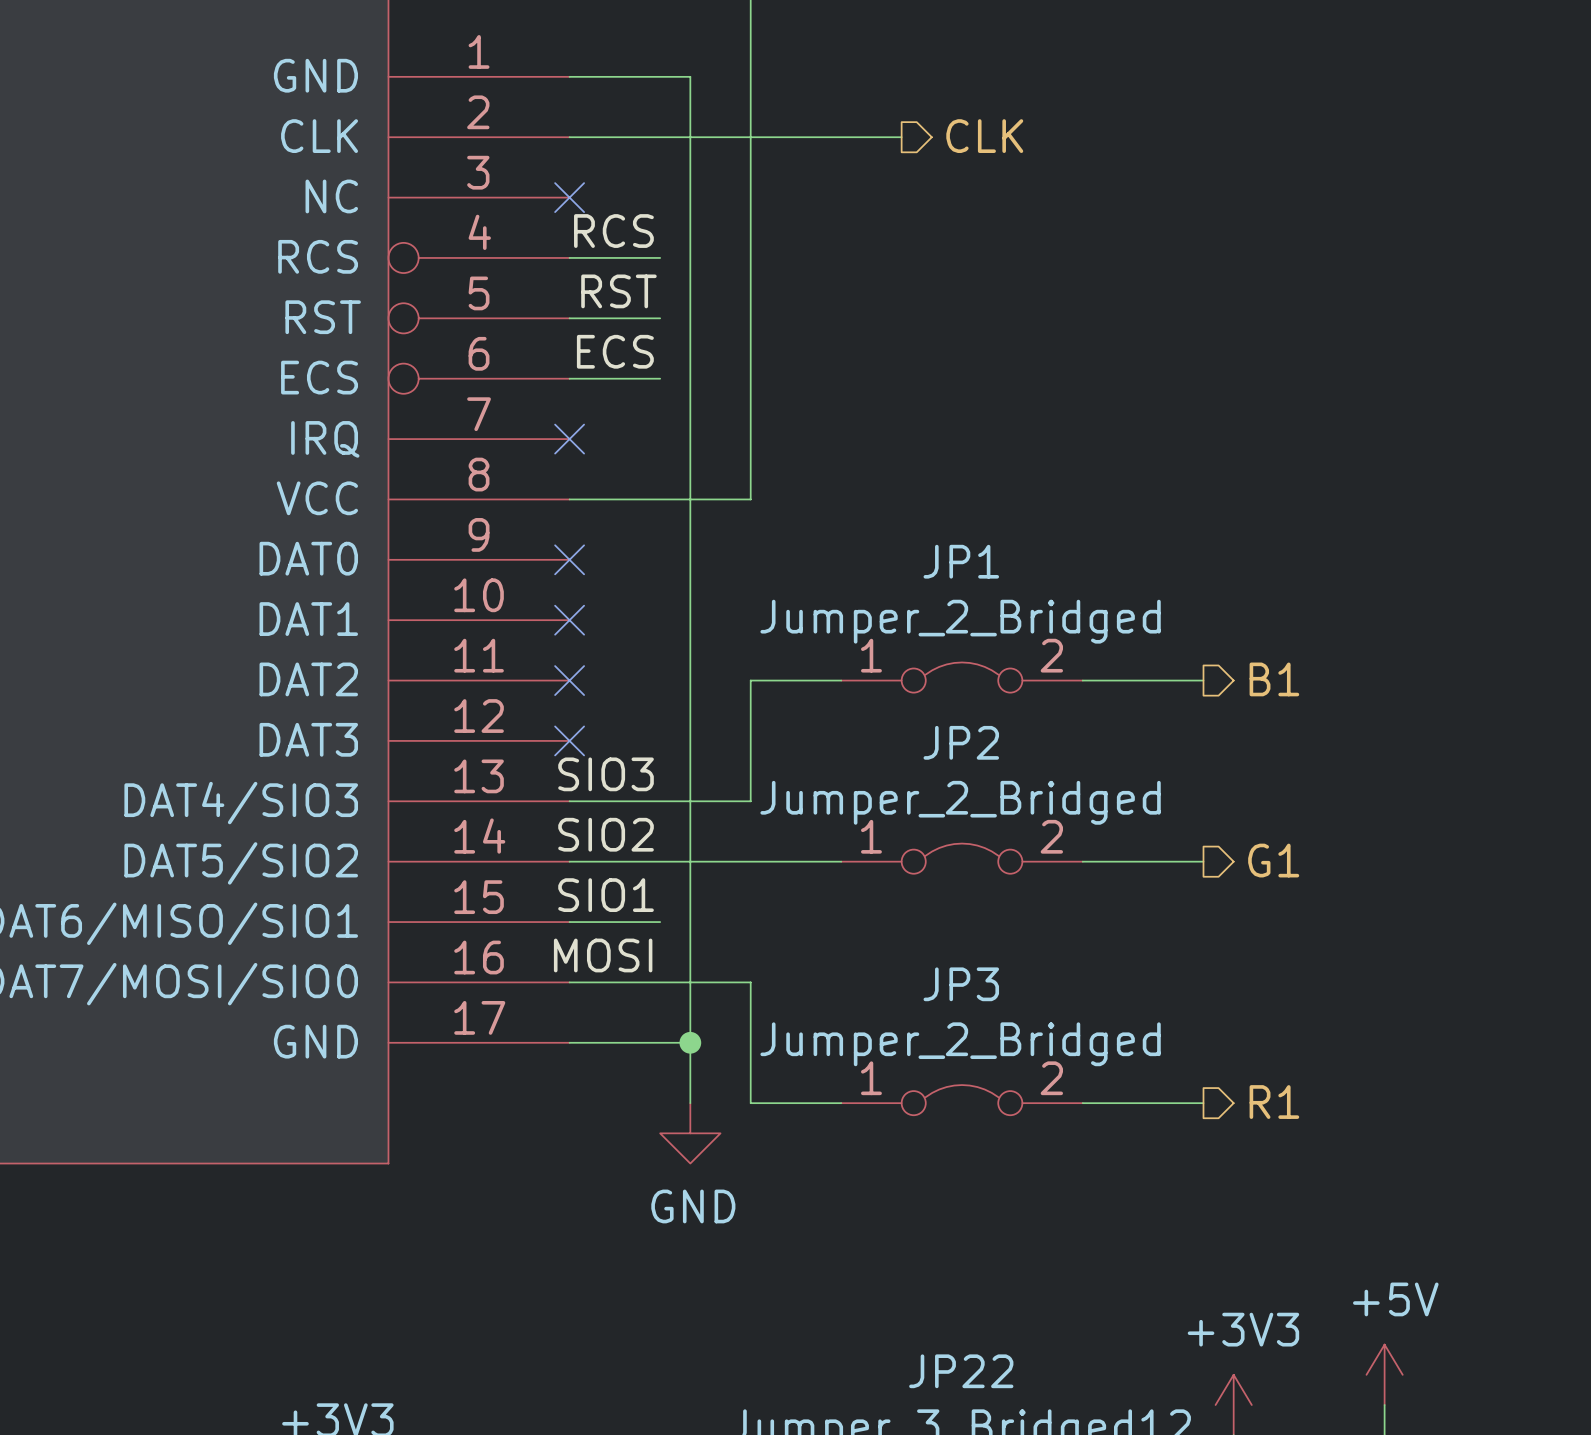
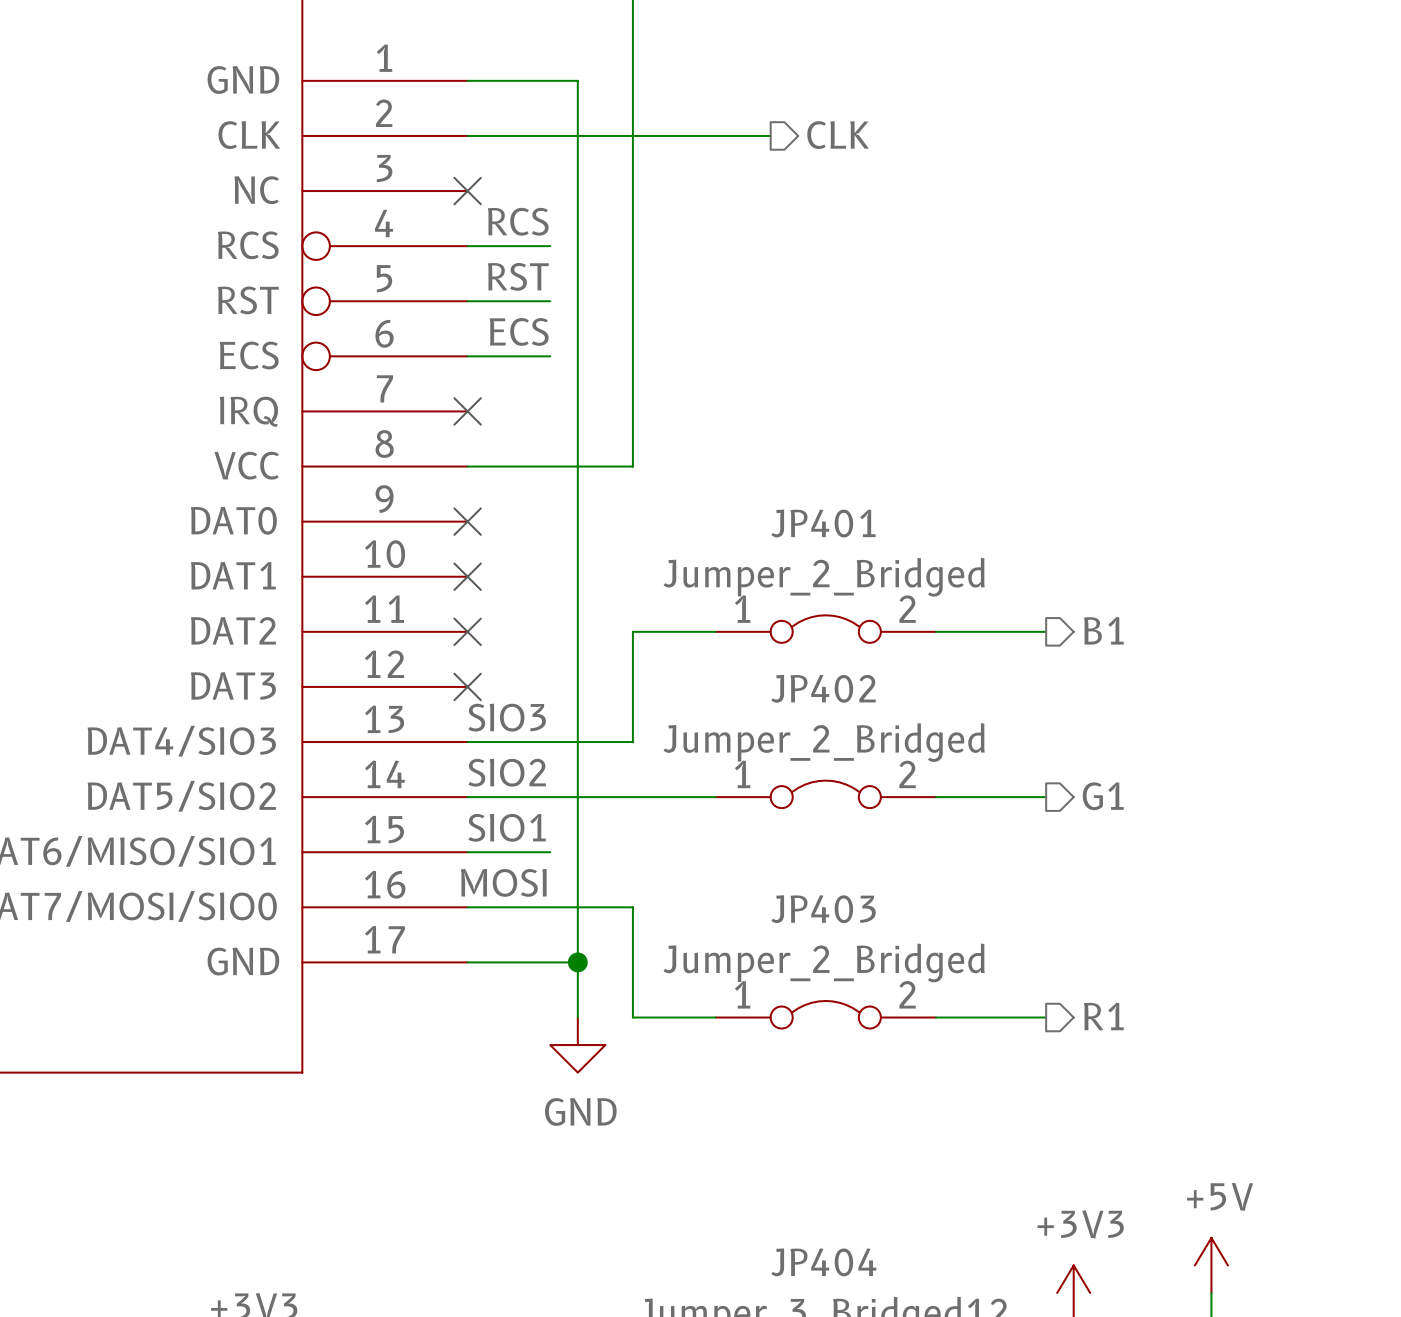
JP1 name: JP1 (961, 561) -> JP401 (823, 523)
JP2 name: JP2 (961, 742) -> JP402 (823, 688)
JP3 name: JP3 (961, 984) -> JP403 (823, 909)
JP22 name: JP22 (961, 1371) -> JP404 (823, 1262)

